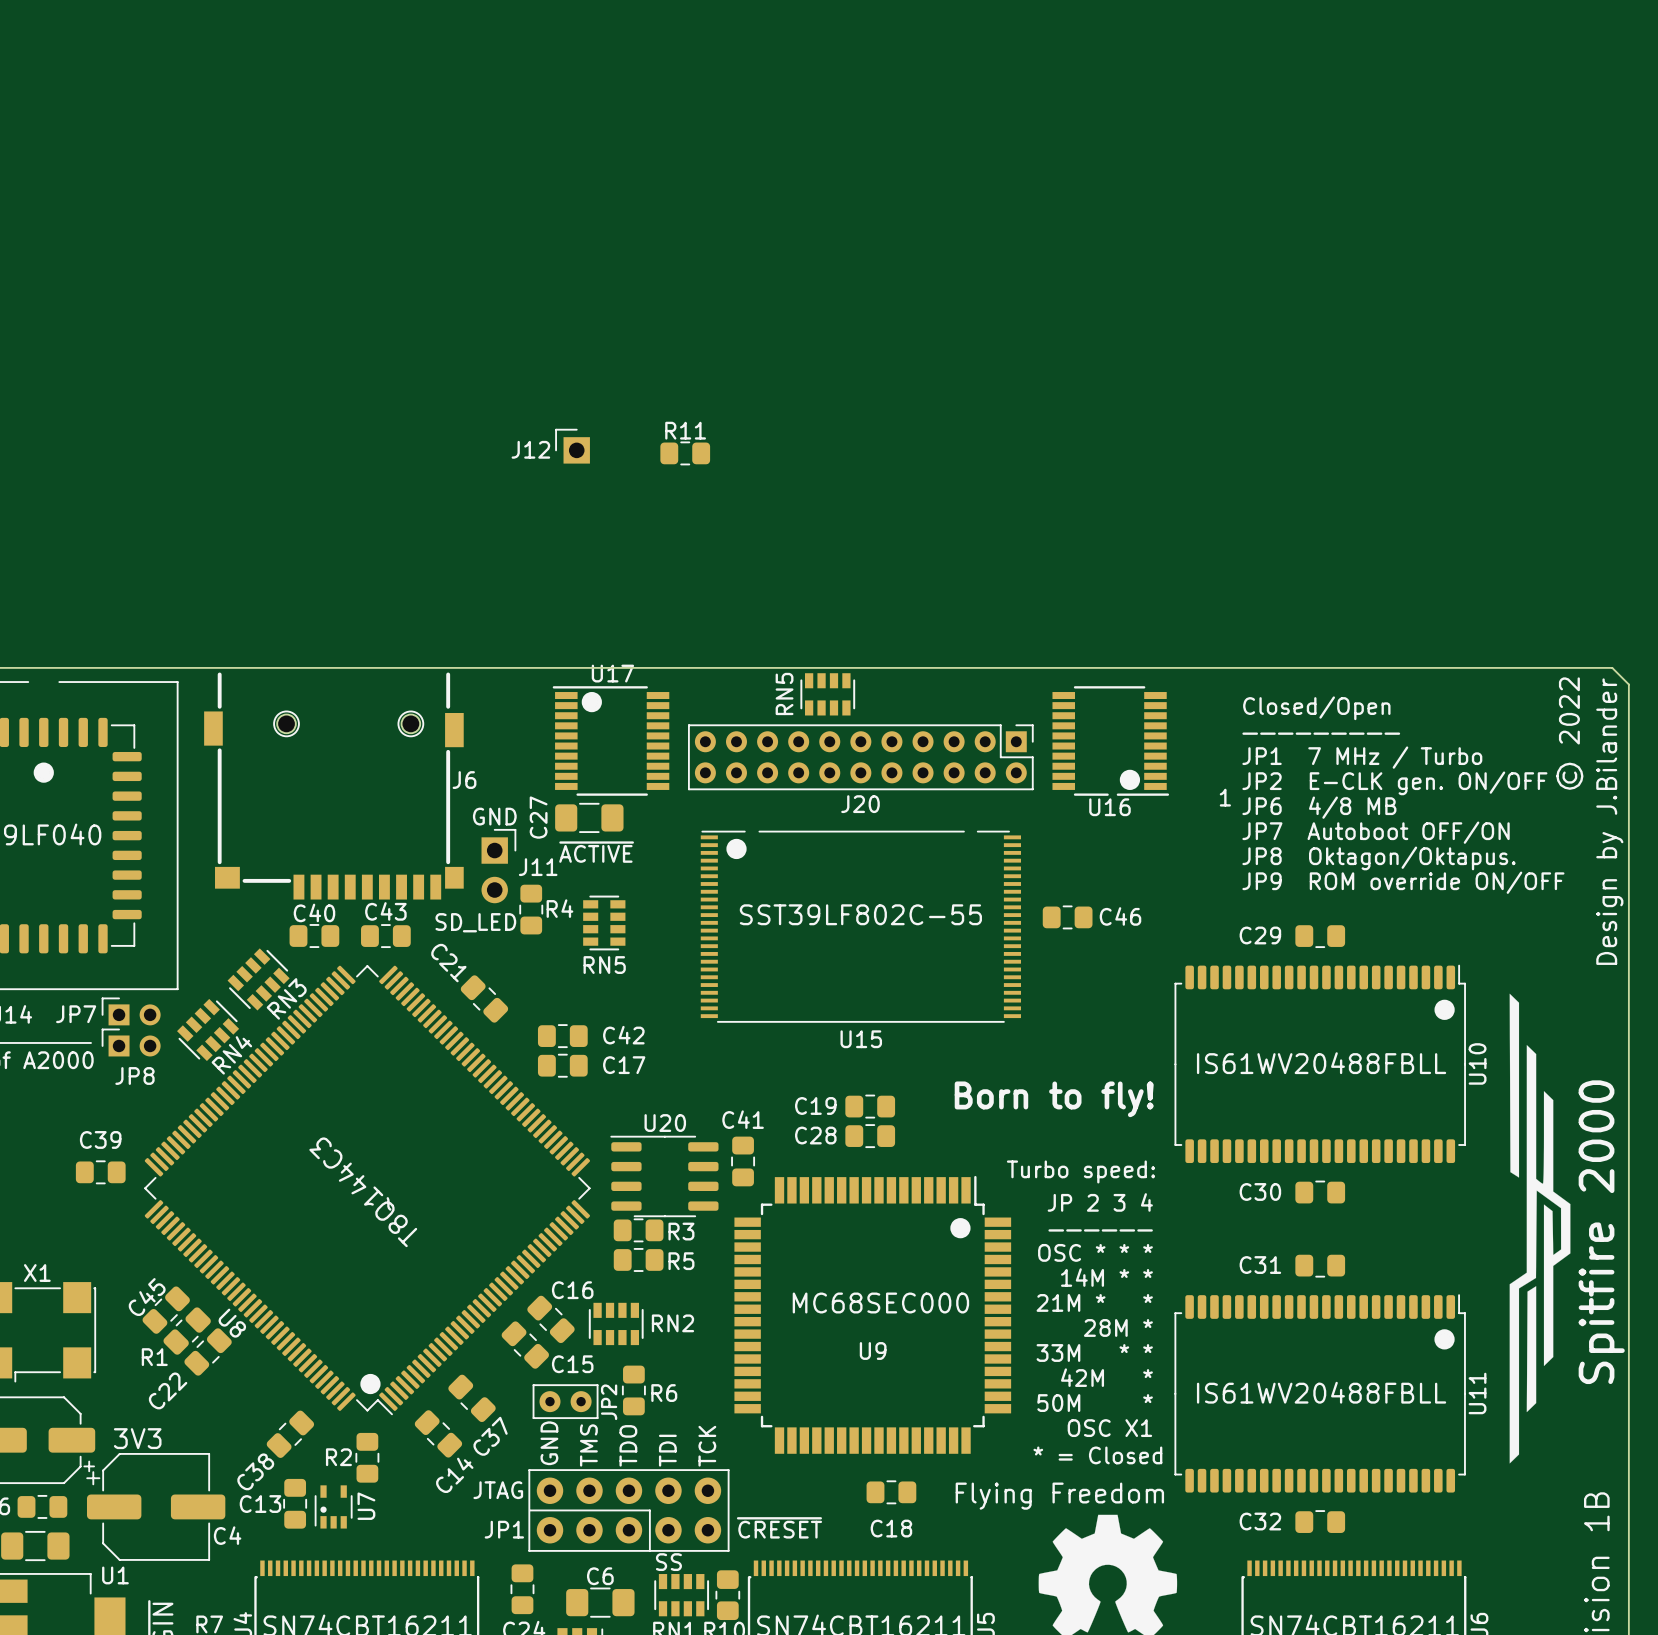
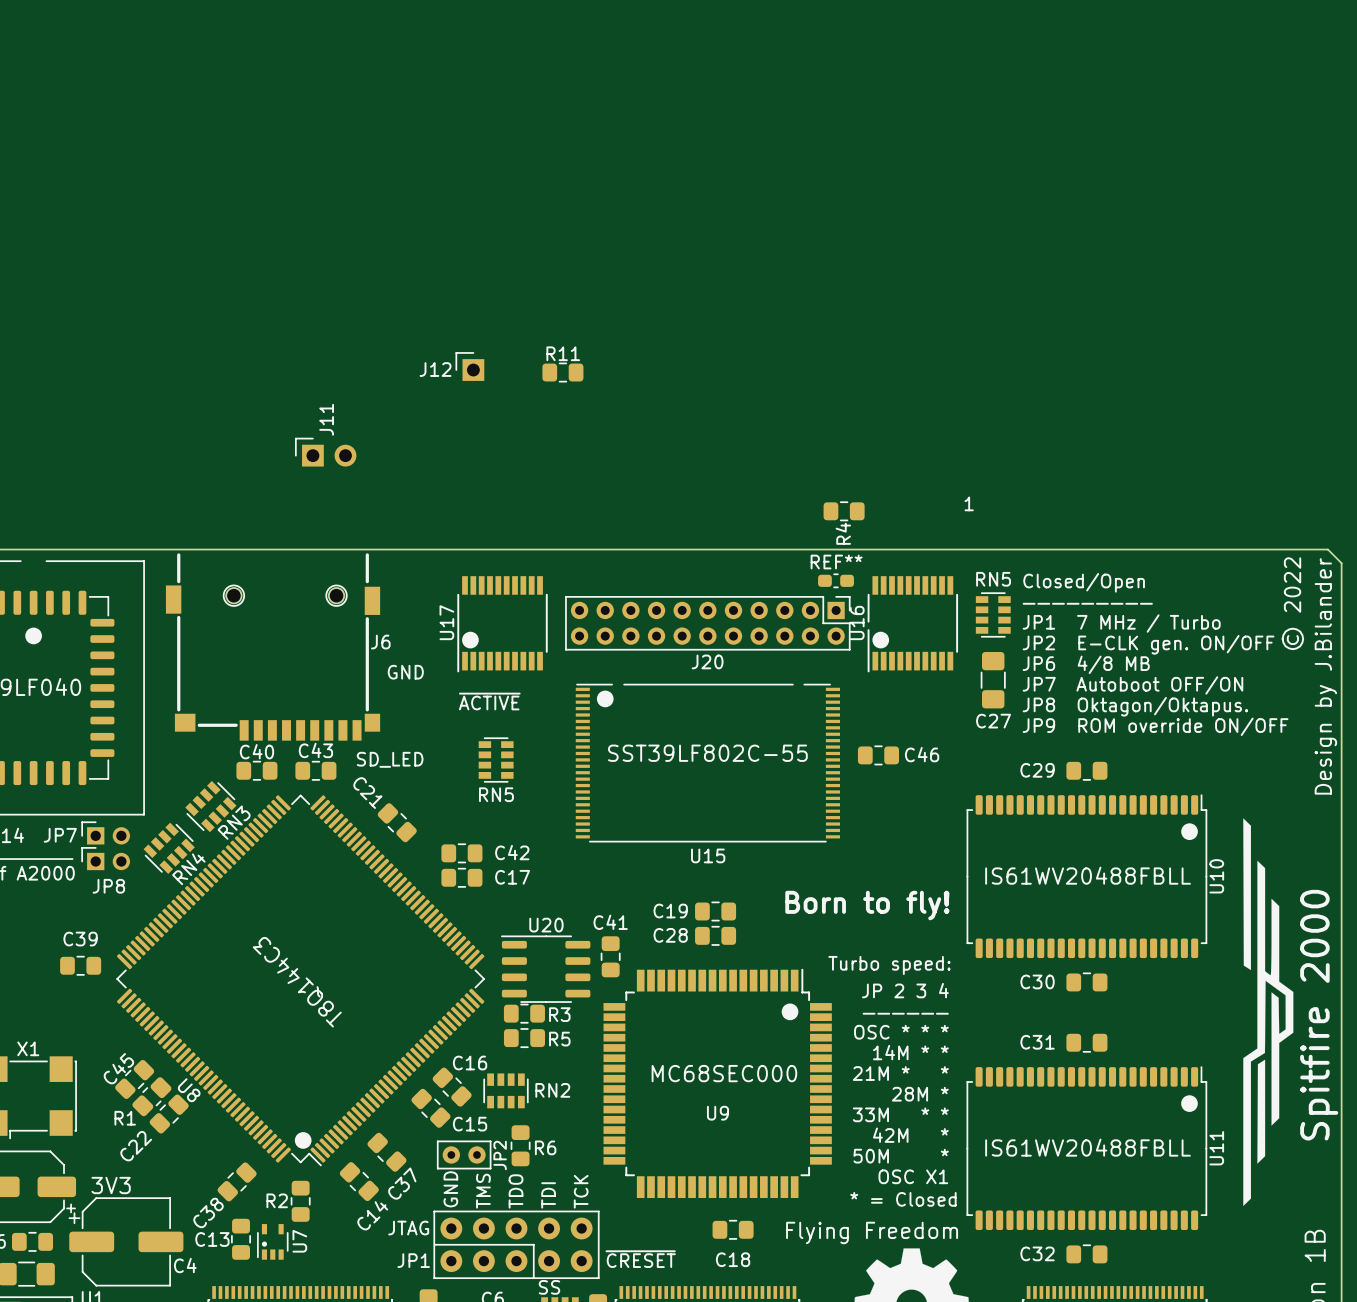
RN5 rotation: 0° (827, 694) -> 90° clockwise (993, 614)
RN5 position: (827, 694) -> (993, 614)
REF**: none -> (836, 580)
U17 rotation: 0° (611, 740) -> 90° counterclockwise (502, 624)
U16 rotation: 0° (1110, 741) -> 90° clockwise (912, 624)
text position: 1 (1225, 797) -> 1 (969, 503)
C27 name position: C27 (538, 817) -> C27 (993, 721)
C27 rotation: 0° (589, 817) -> 90° clockwise (993, 680)
C27 position: (589, 817) -> (993, 680)
J11 rotation: 0° (498, 866) -> 90° counterclockwise (325, 452)
J11 position: (498, 866) -> (325, 452)
R4 rotation: 0° (531, 909) -> 90° clockwise (844, 511)
R4 position: (531, 909) -> (844, 511)

